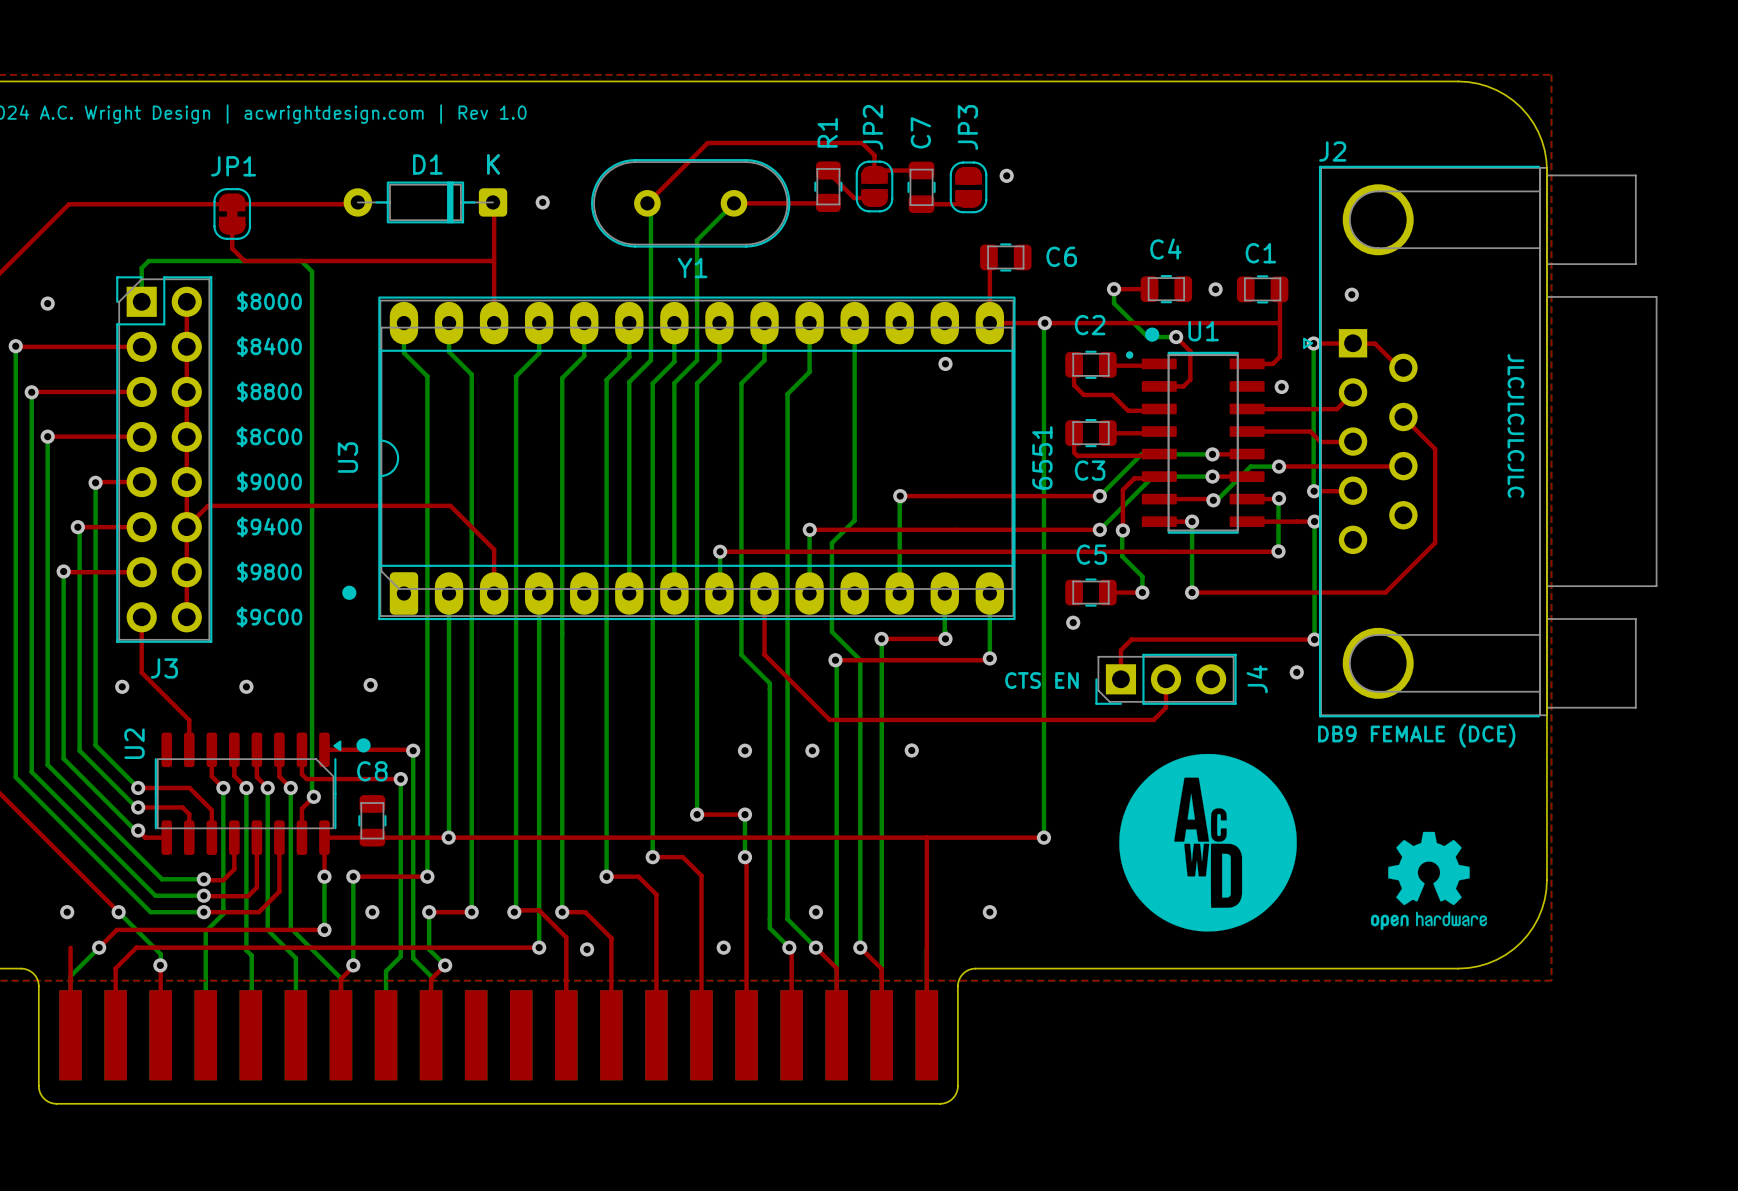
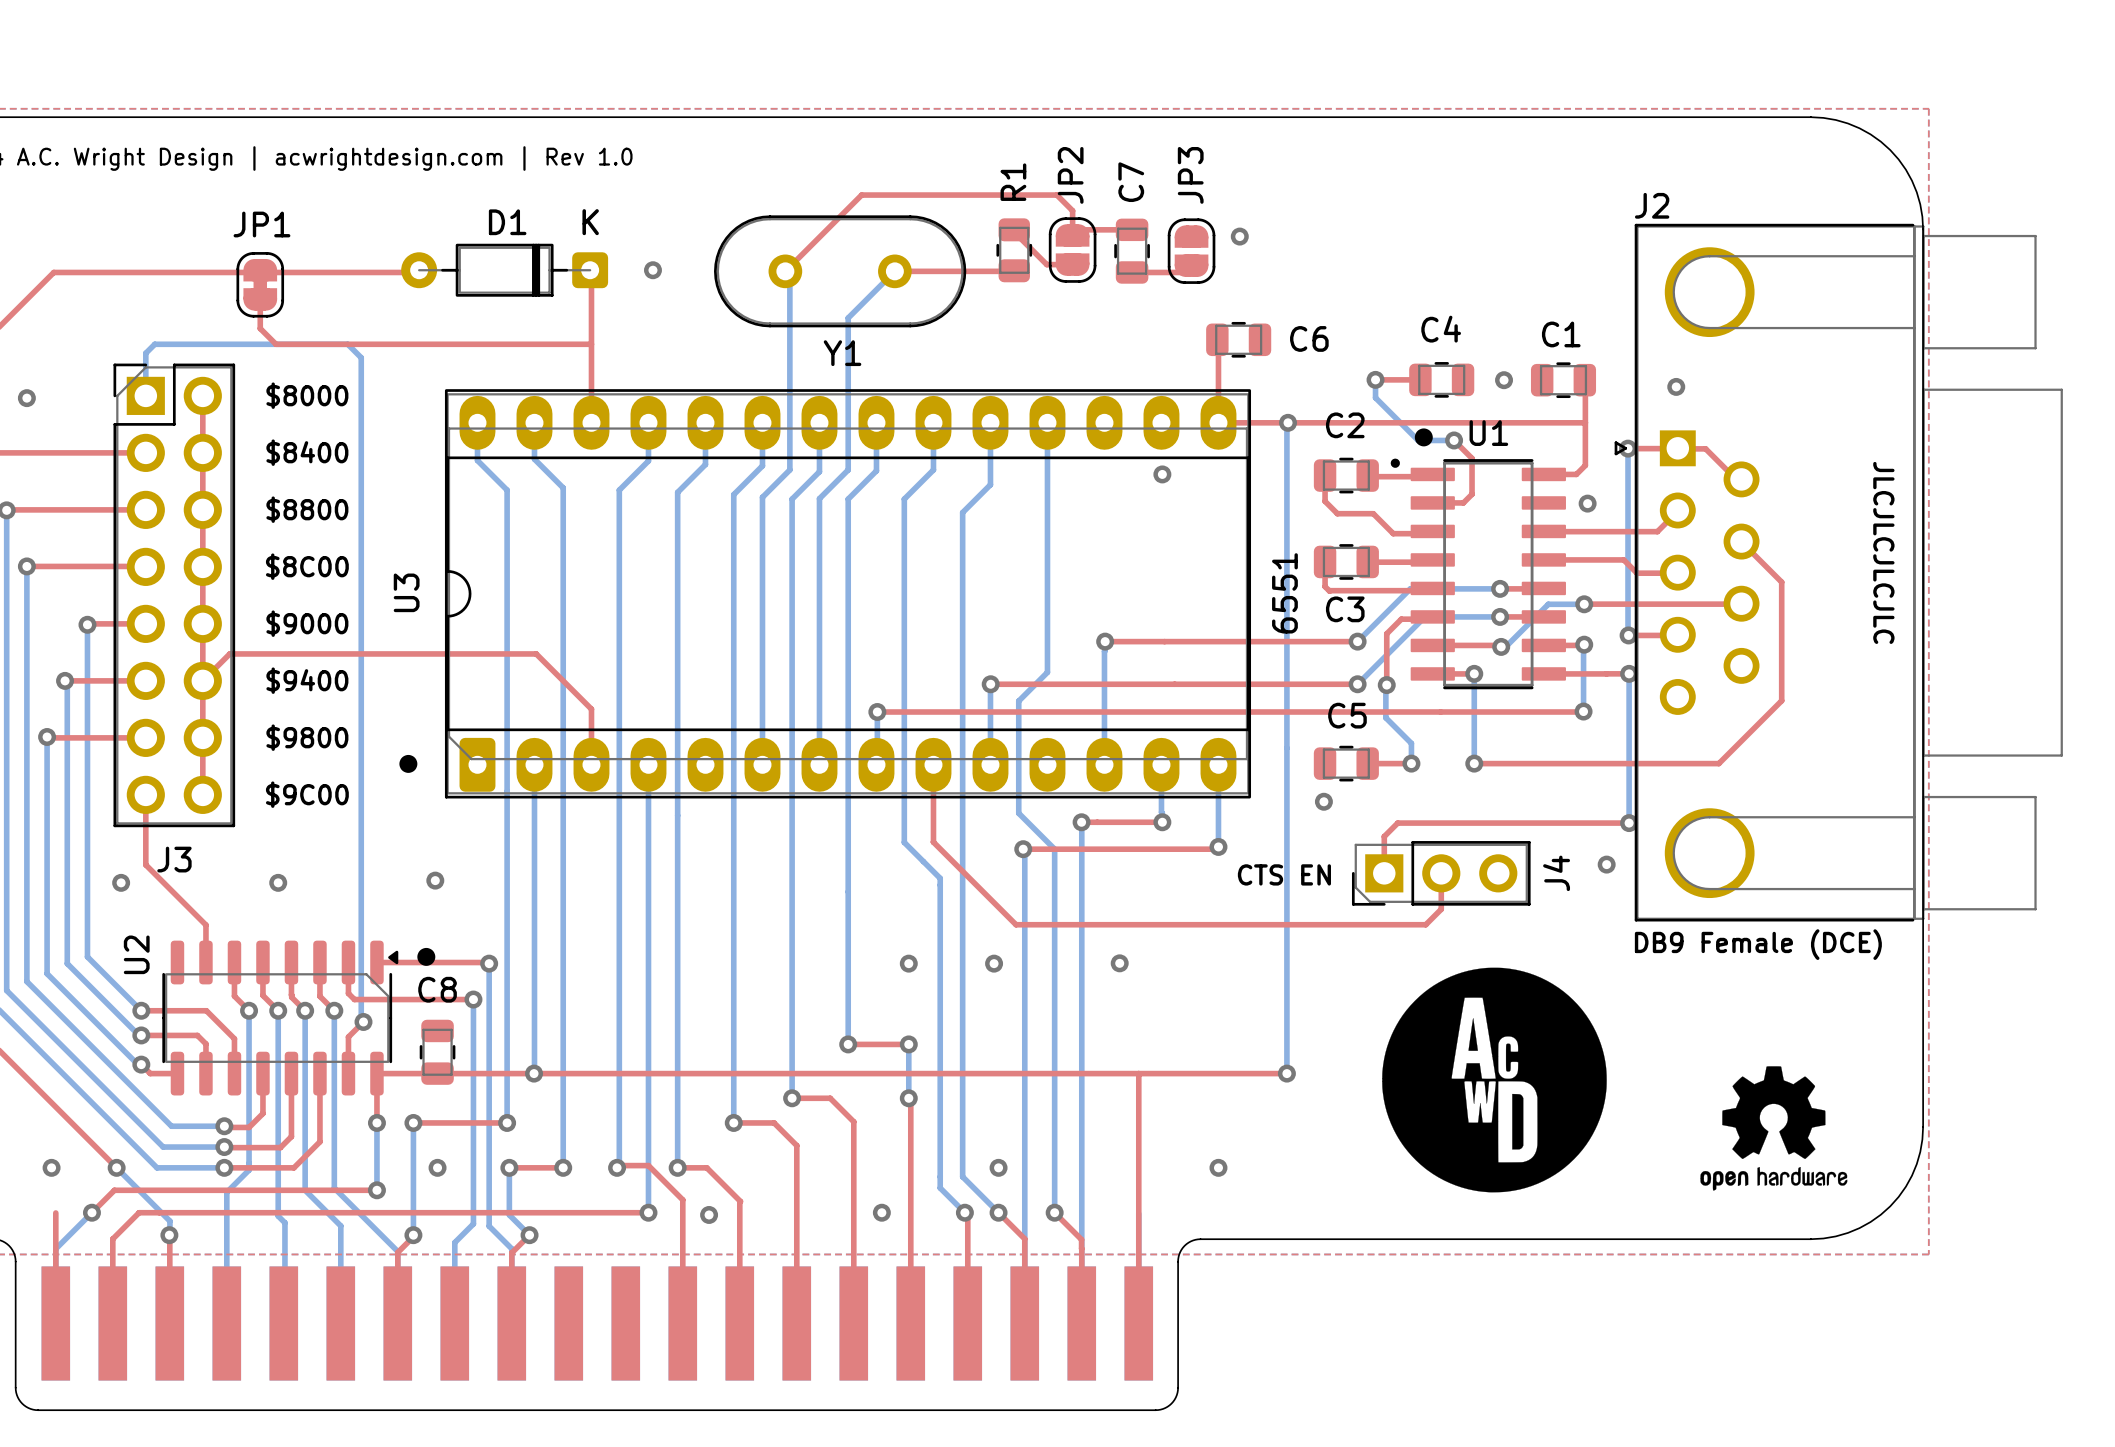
J2 value: DB9 FEMALE (DCE) (1416, 735) -> DB9 Female (DCE) (1758, 944)

